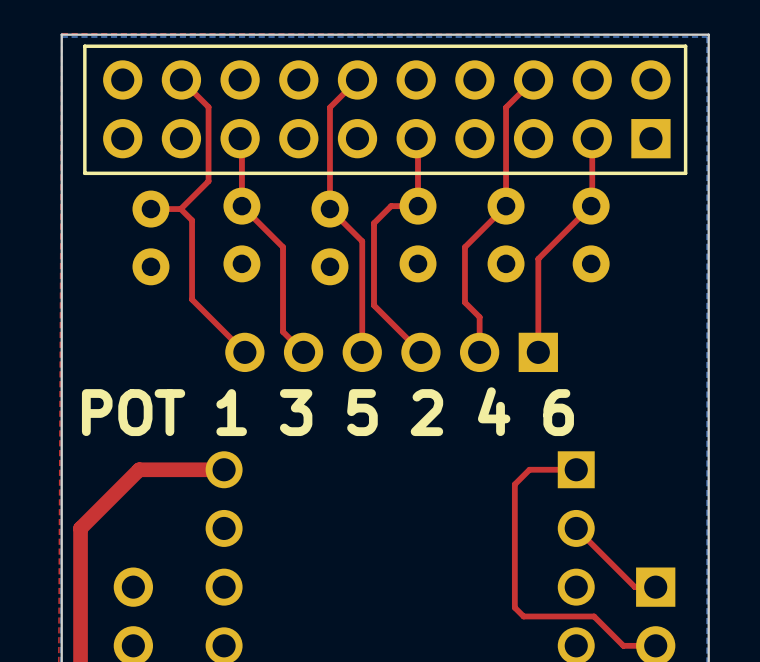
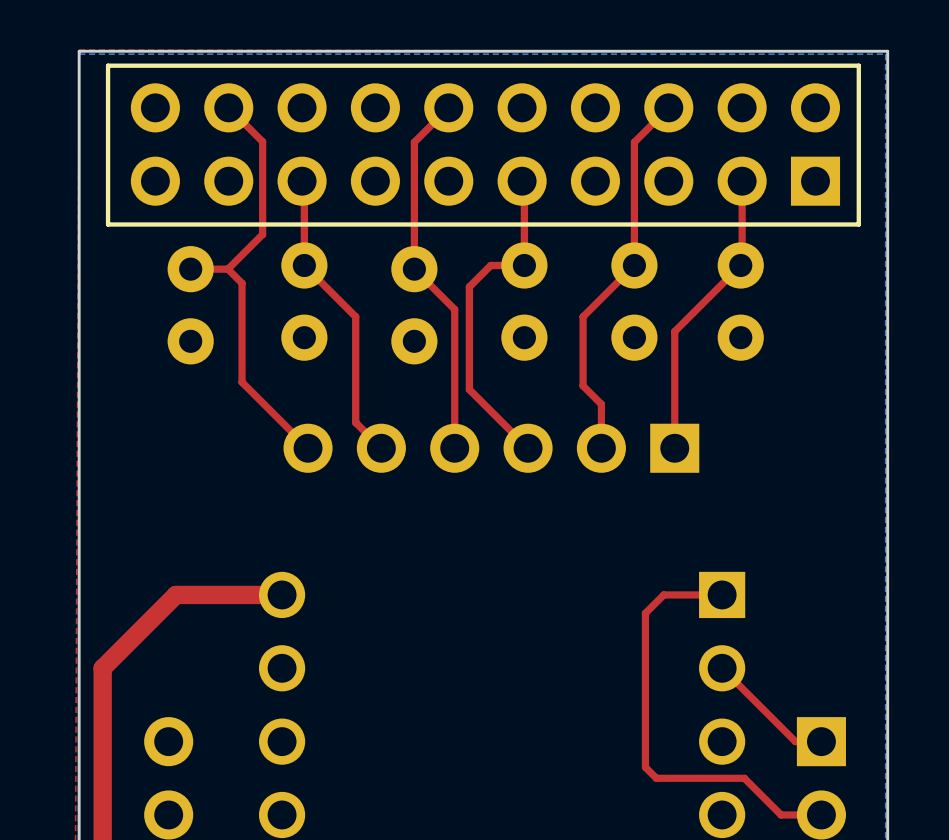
text: POT 1 3 5 2 4 6 (327, 411) -> none

